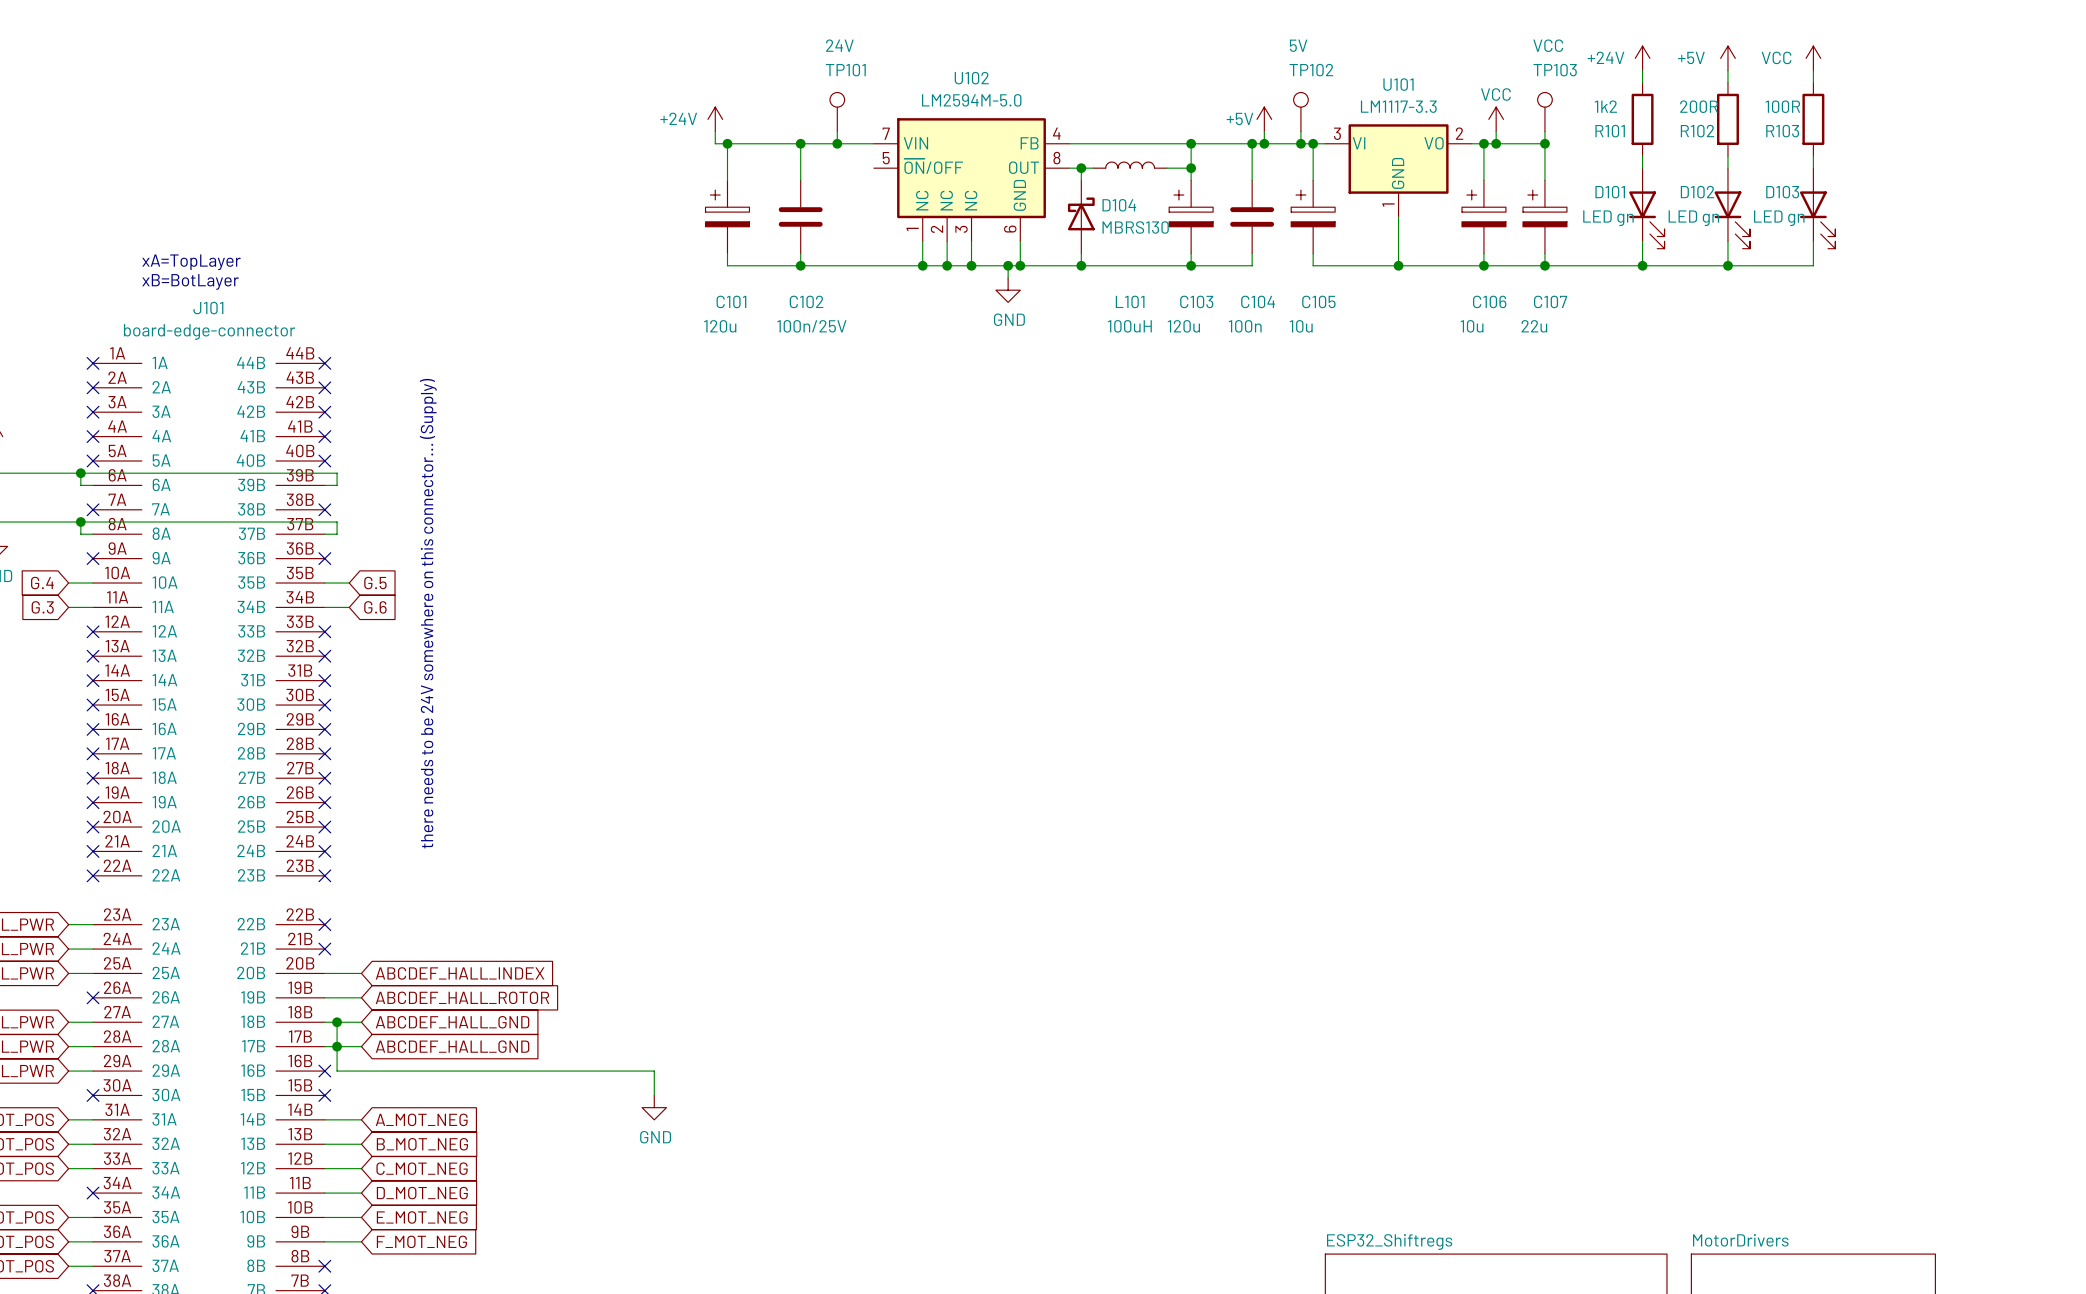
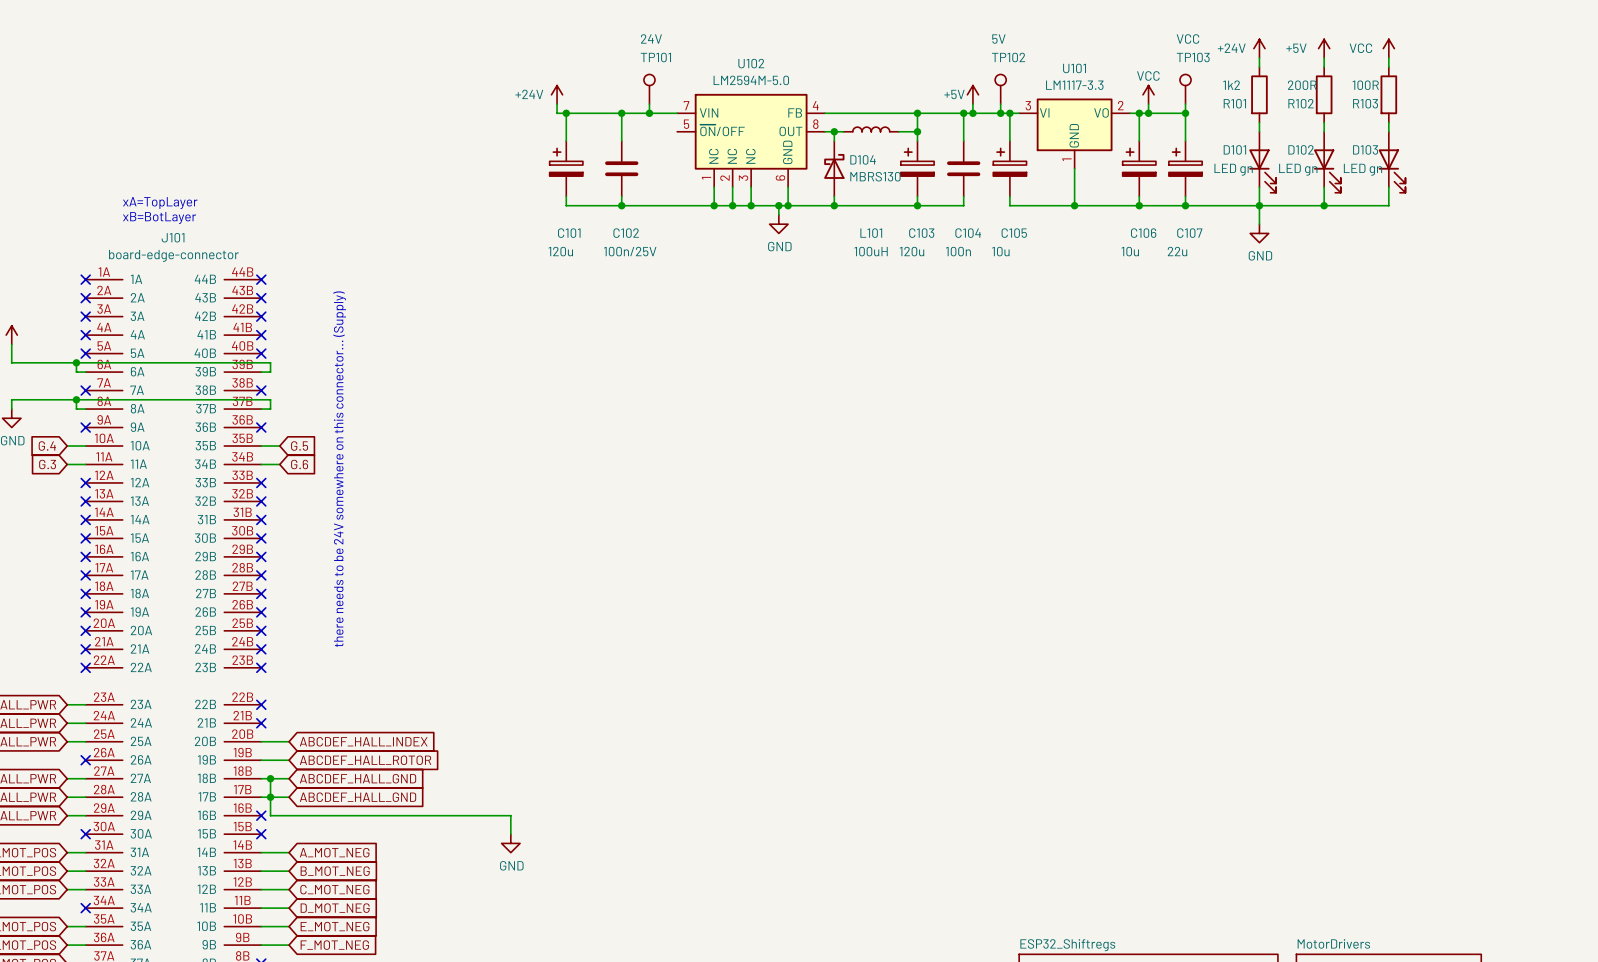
wire: none -> (1259, 205) (1259, 224)
power symbol: none -> GND (1259, 233)

